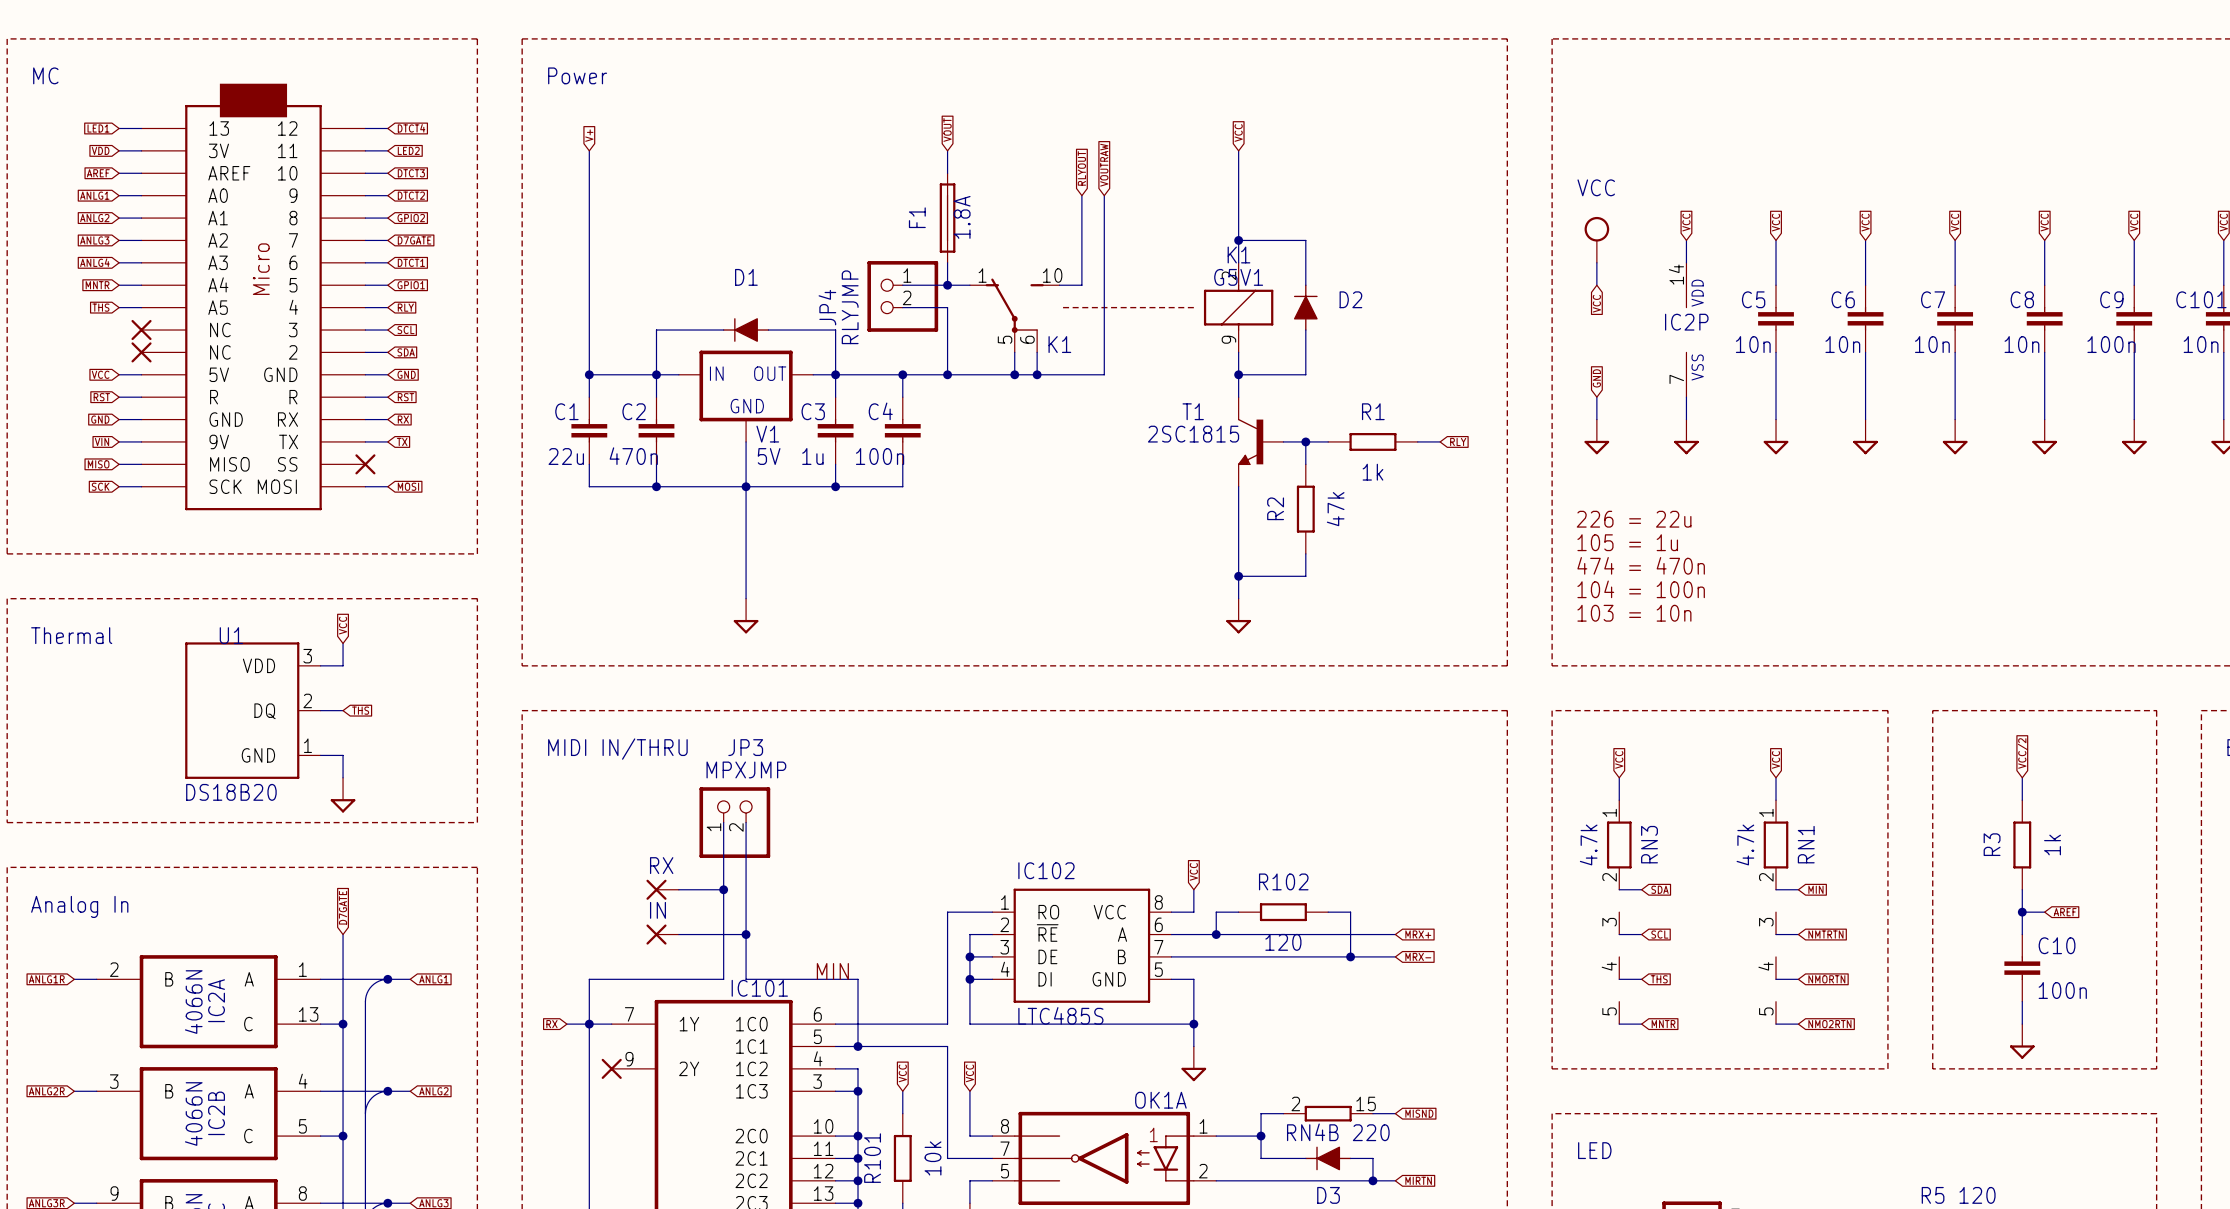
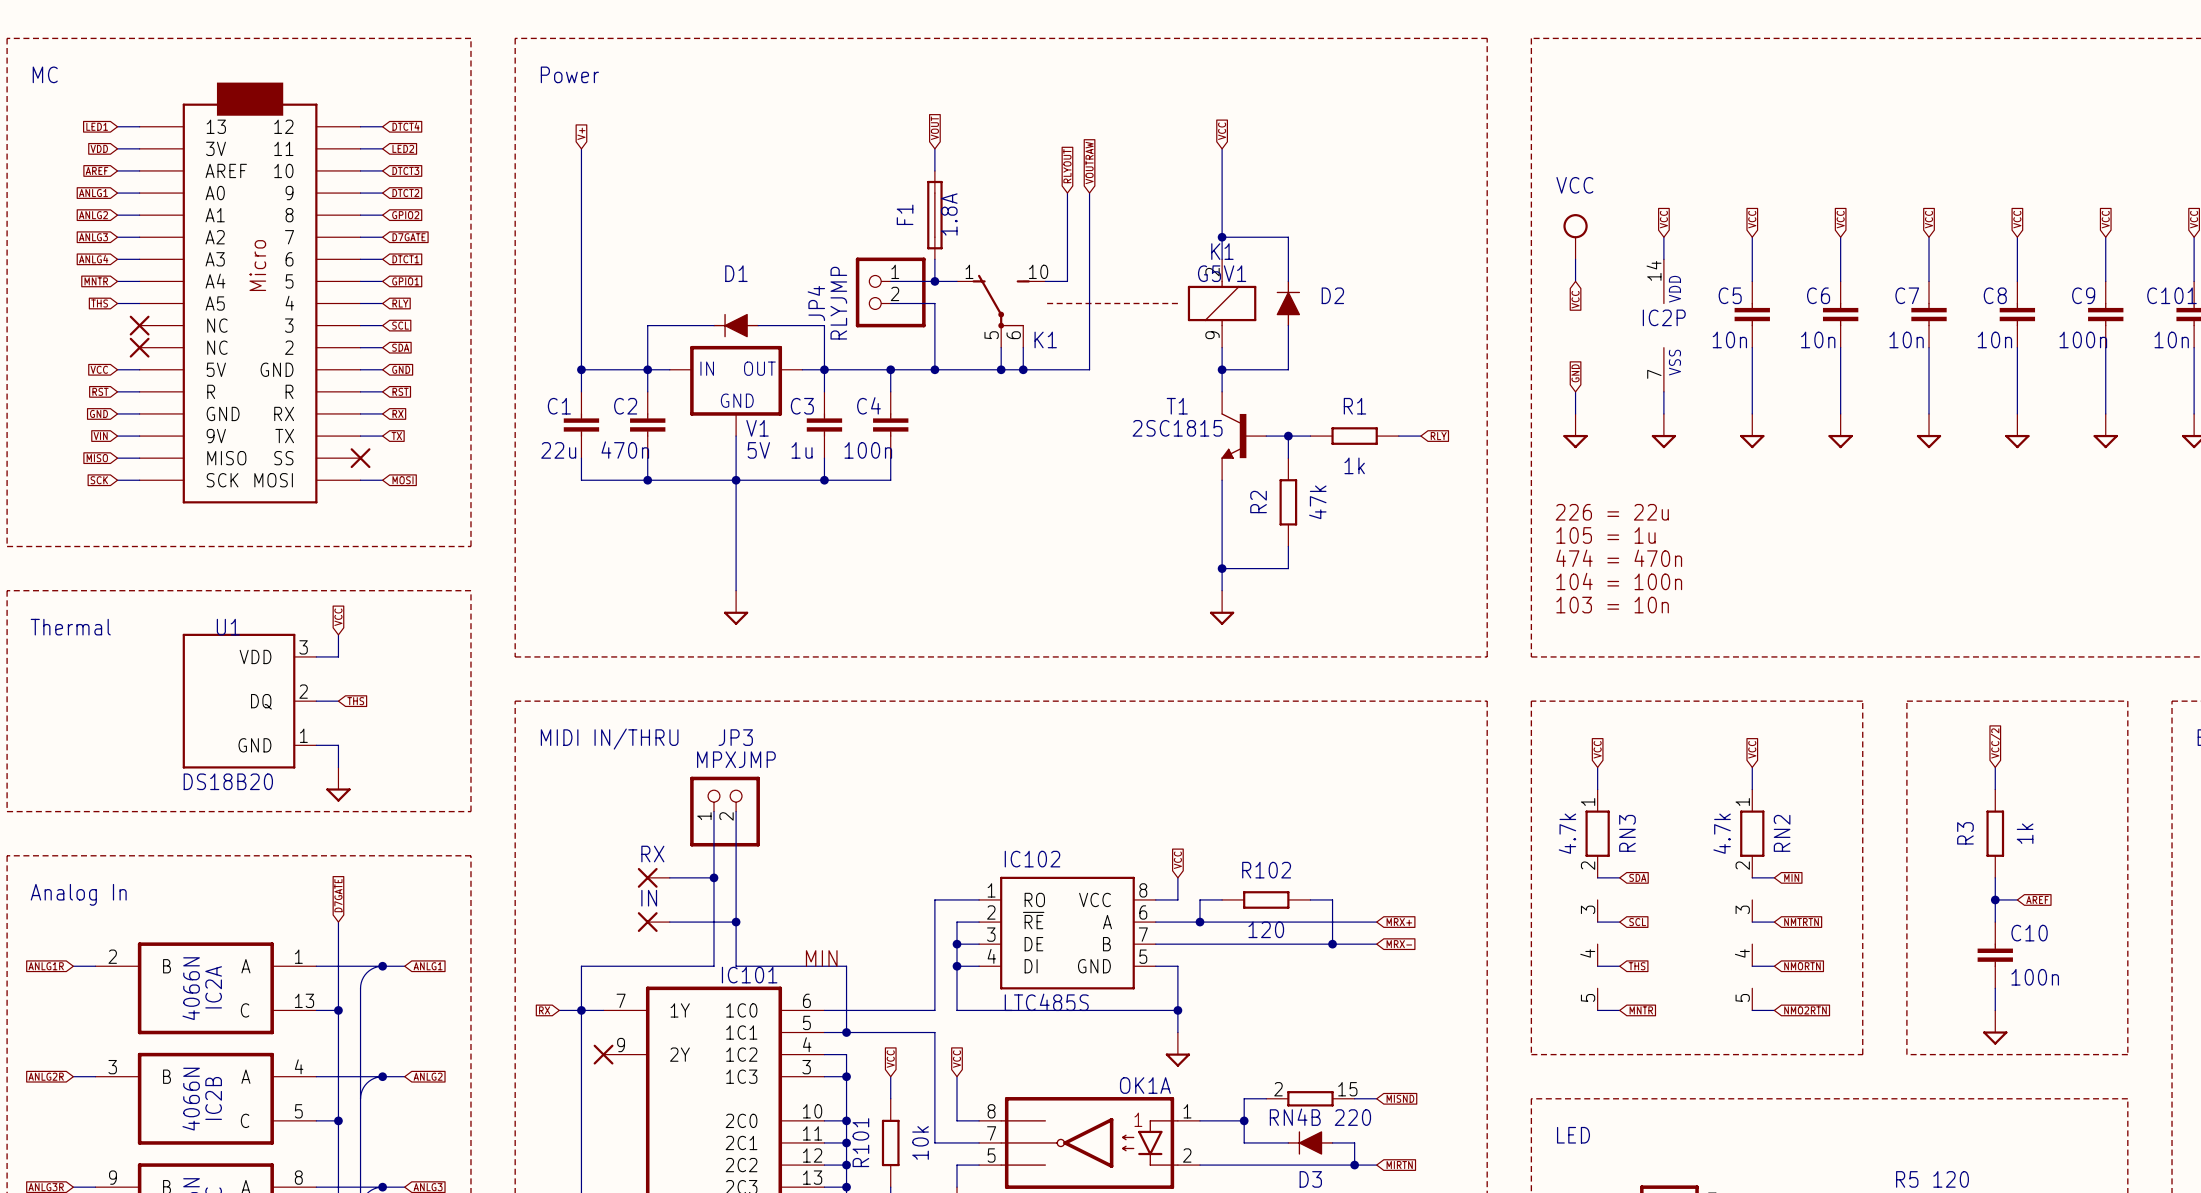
RN1 name: RN1 (1806, 844) -> RN2 (1782, 833)

